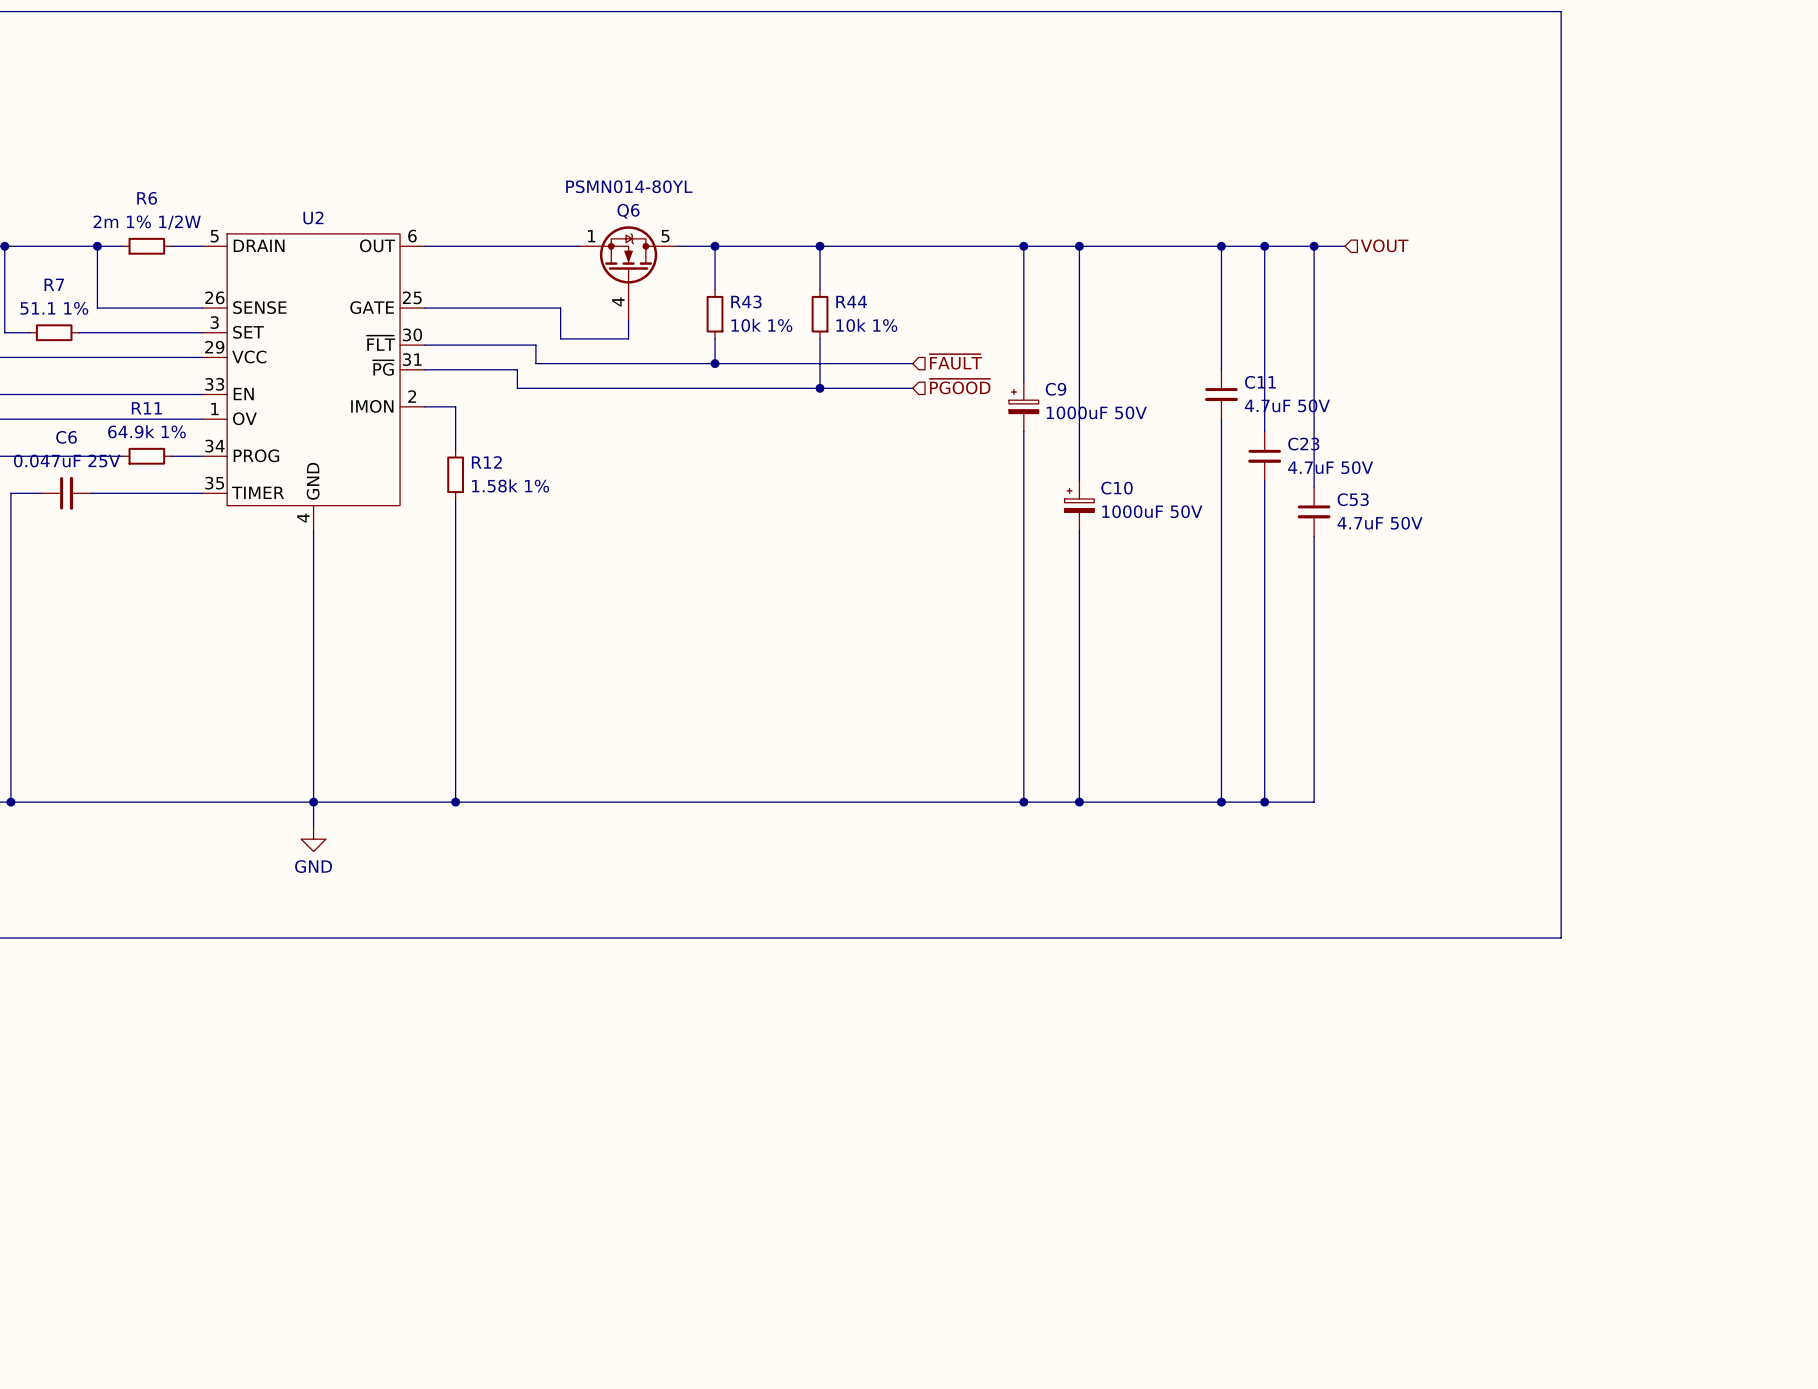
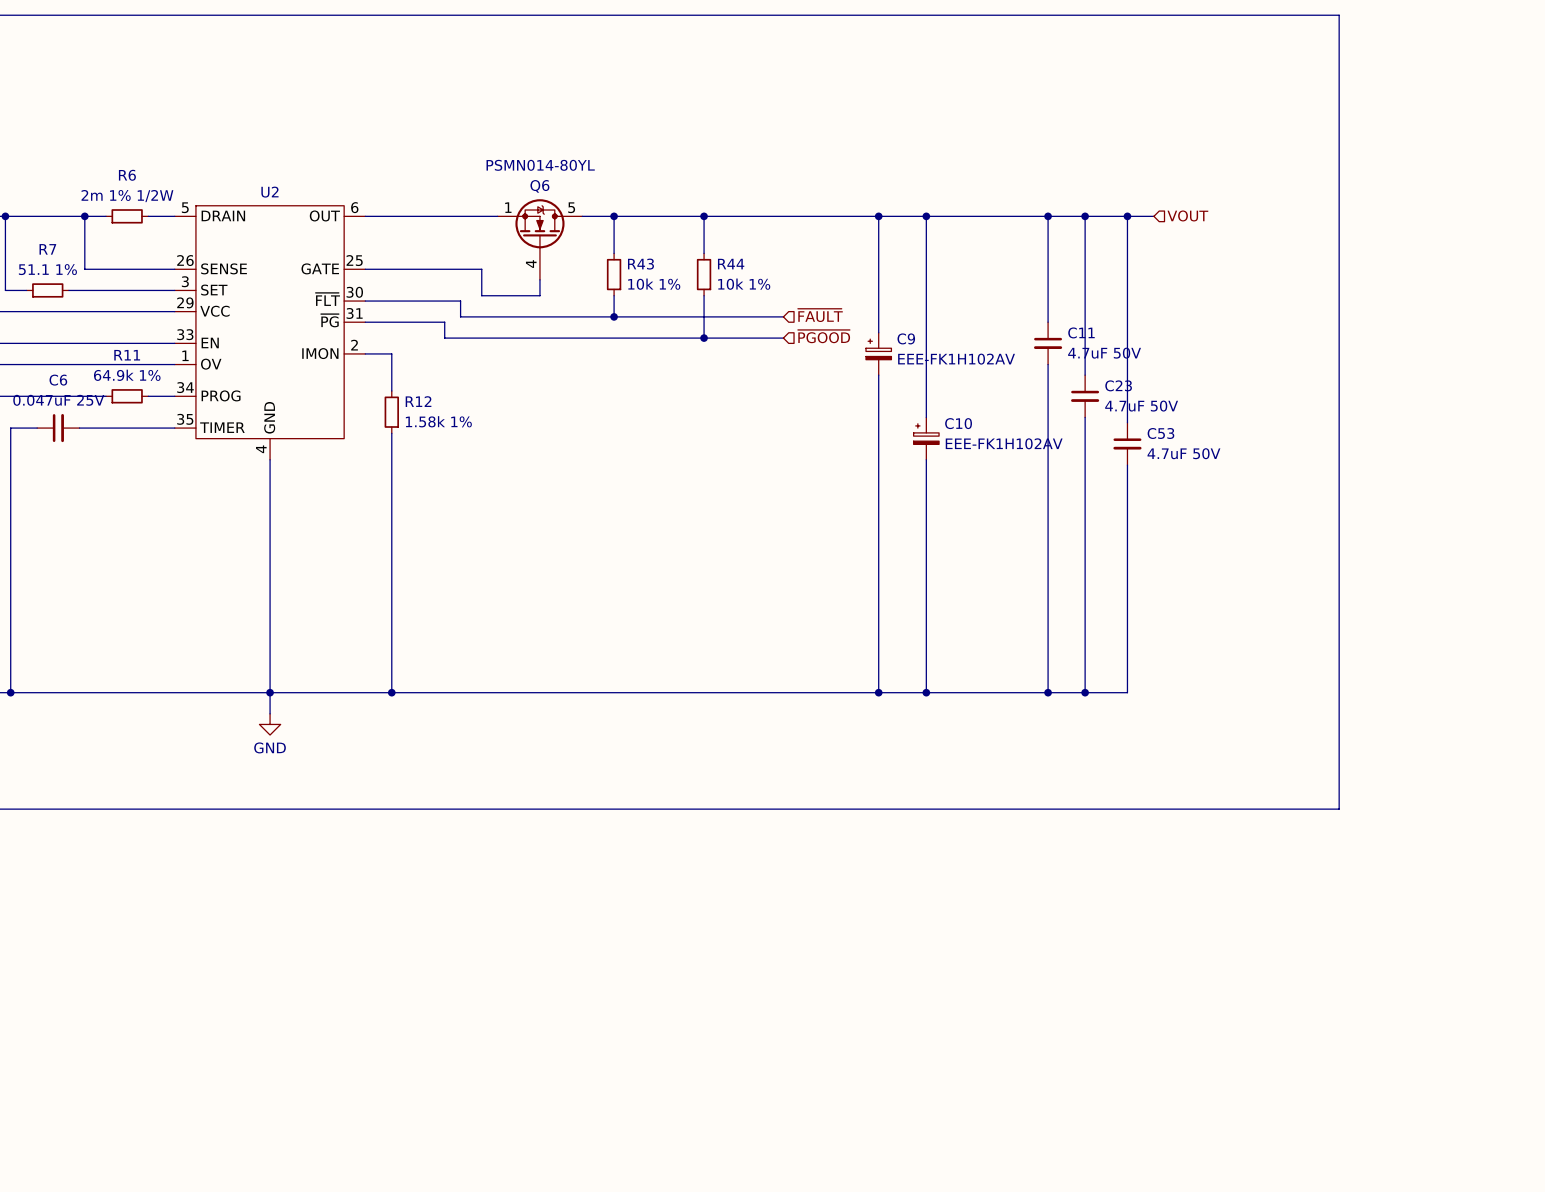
C9 value: 1000uF 50V (1096, 412) -> EEE-FK1H102AV (956, 359)
C10 value: 1000uF 50V (1152, 511) -> EEE-FK1H102AV (1004, 443)

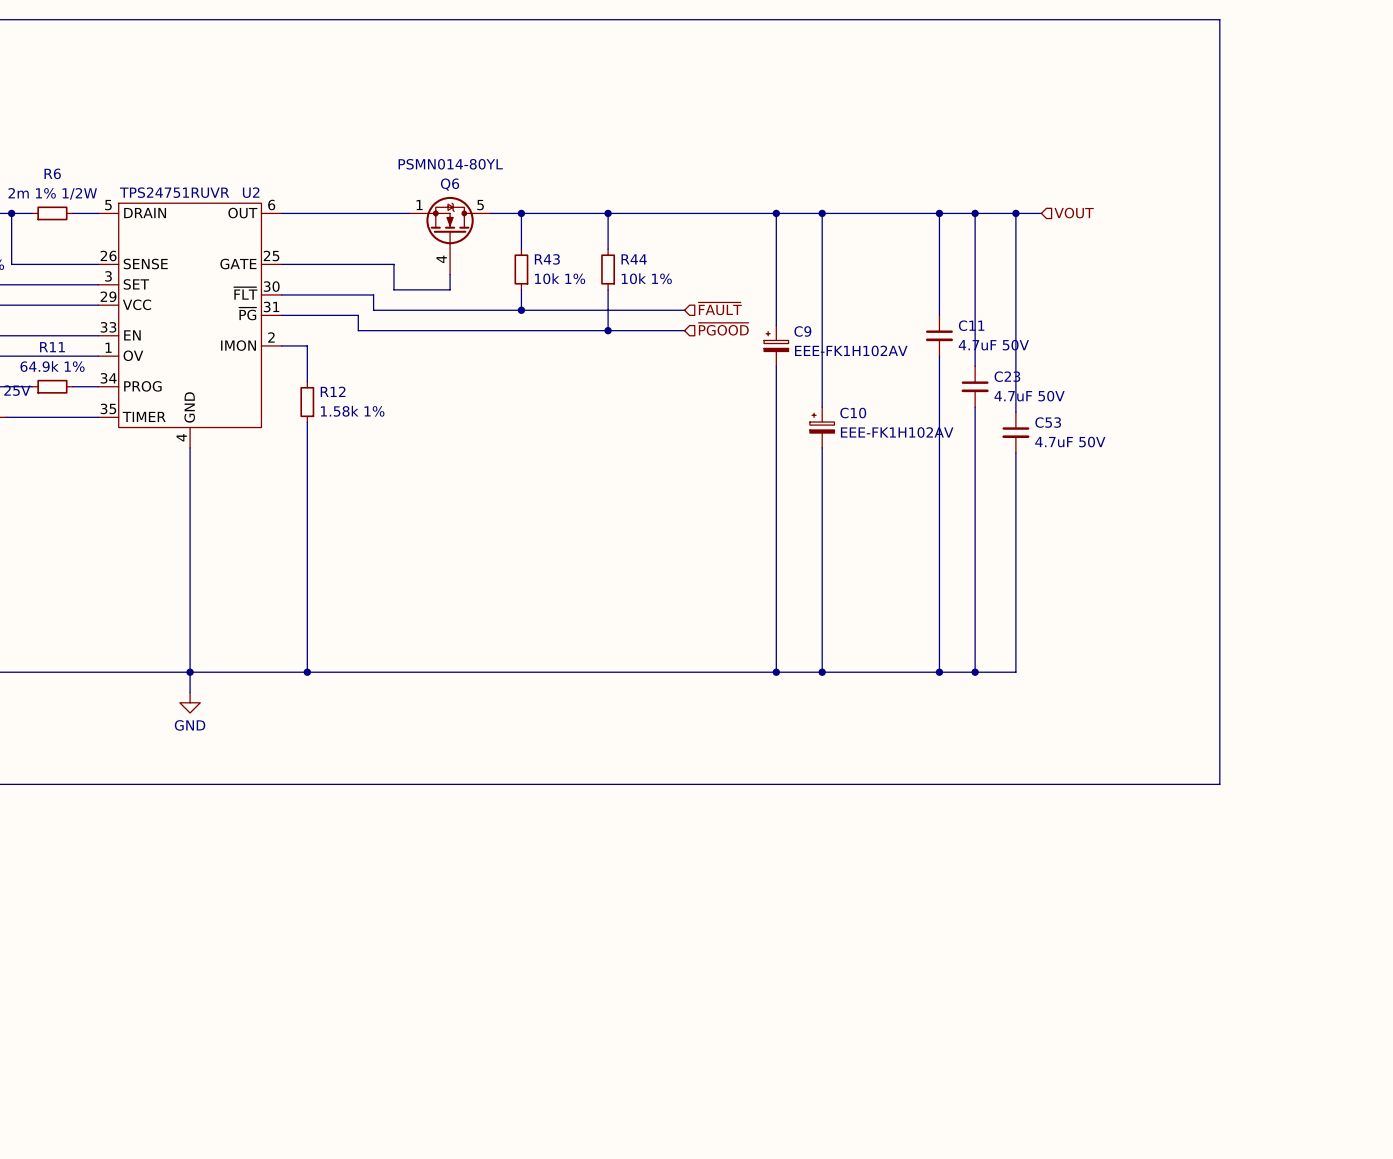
U2 name position: U2 (269, 192) -> U2 (251, 192)
U2 value: none -> TPS24751RUVR (174, 192)

